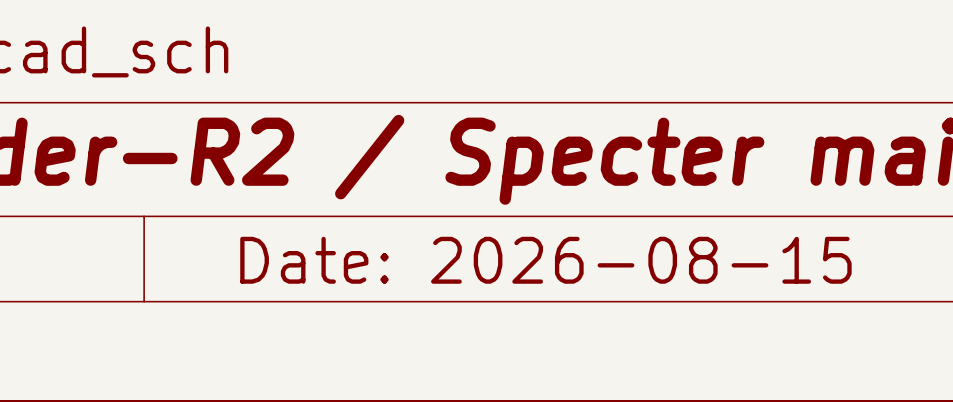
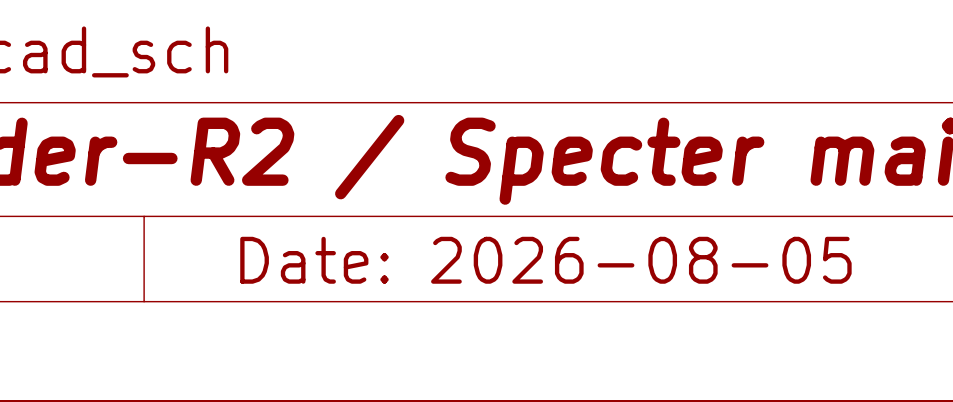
title block: Date: 2026-08-15 (545, 260) -> Date: 2026-08-05 (545, 260)

